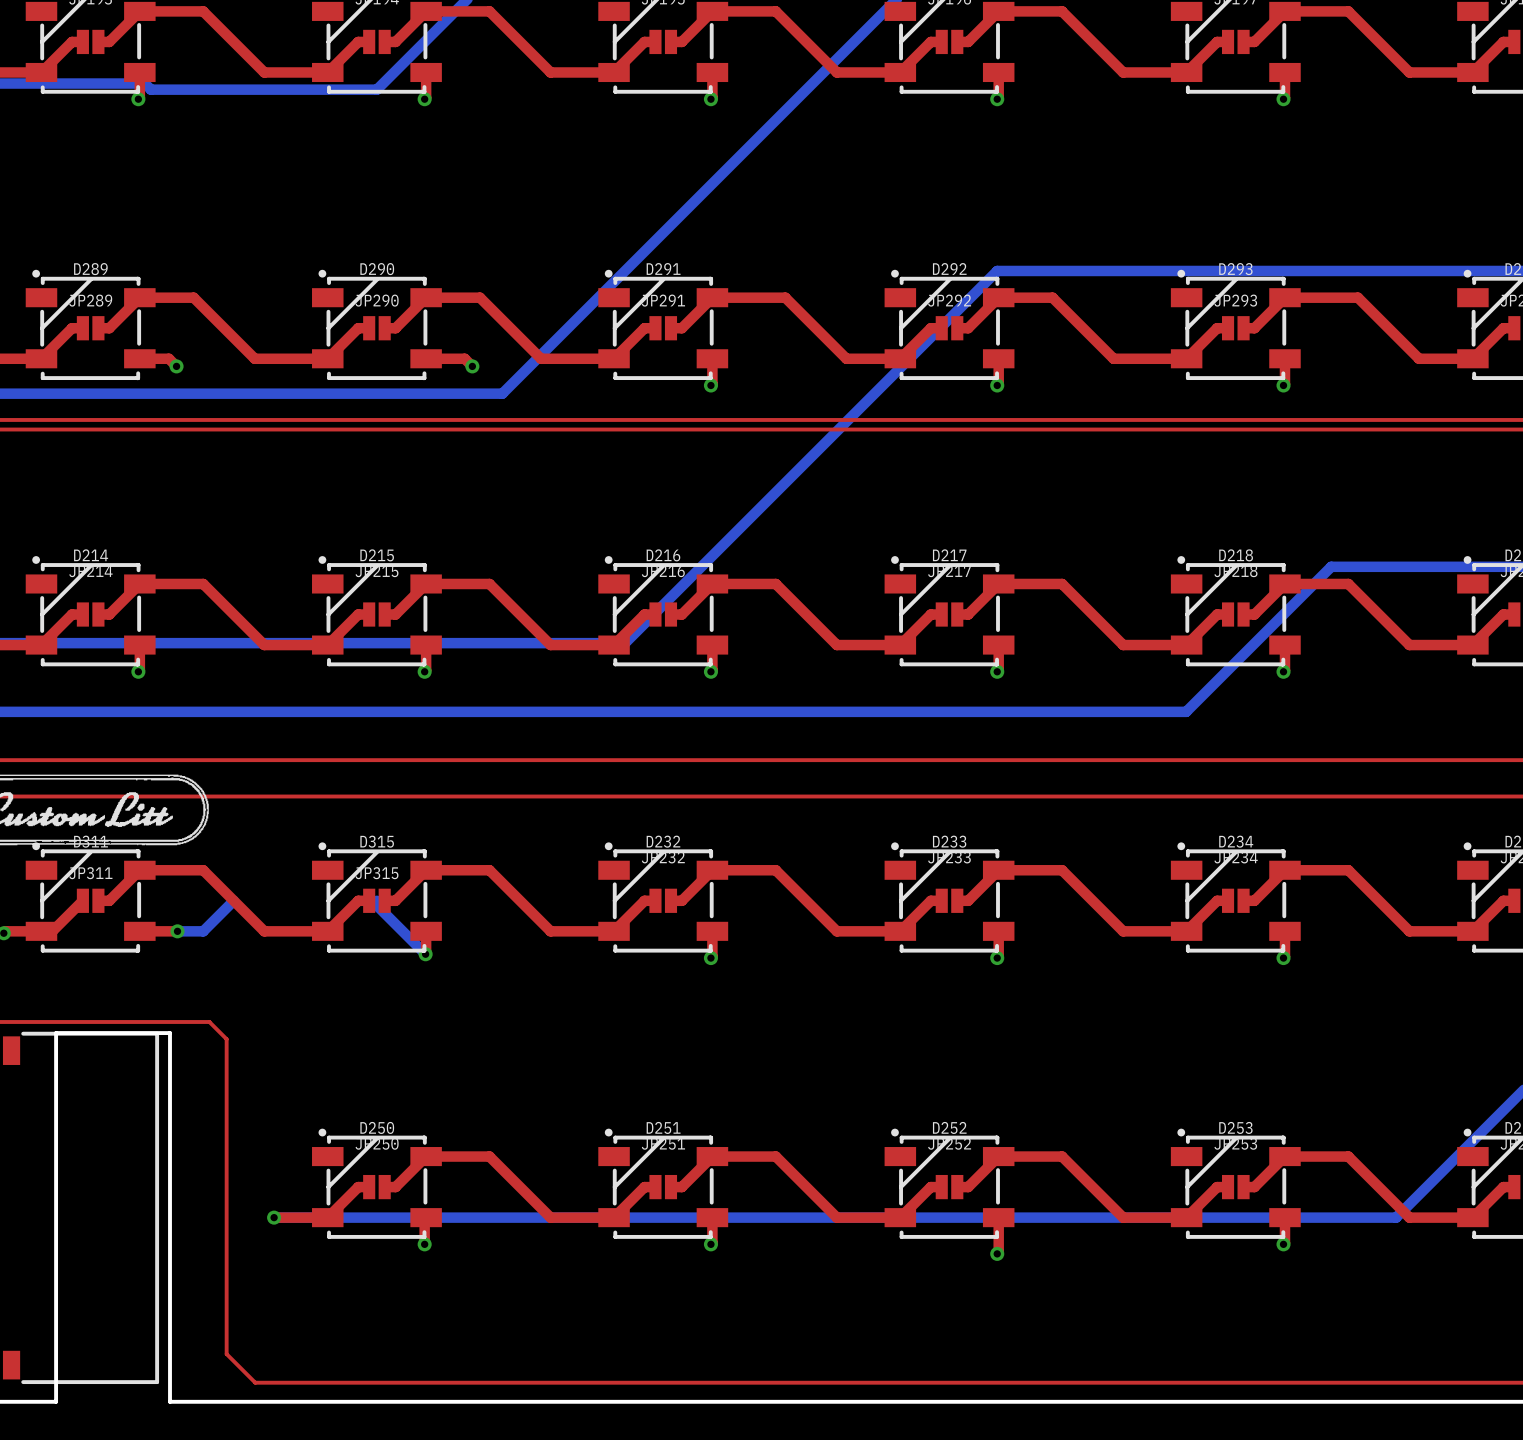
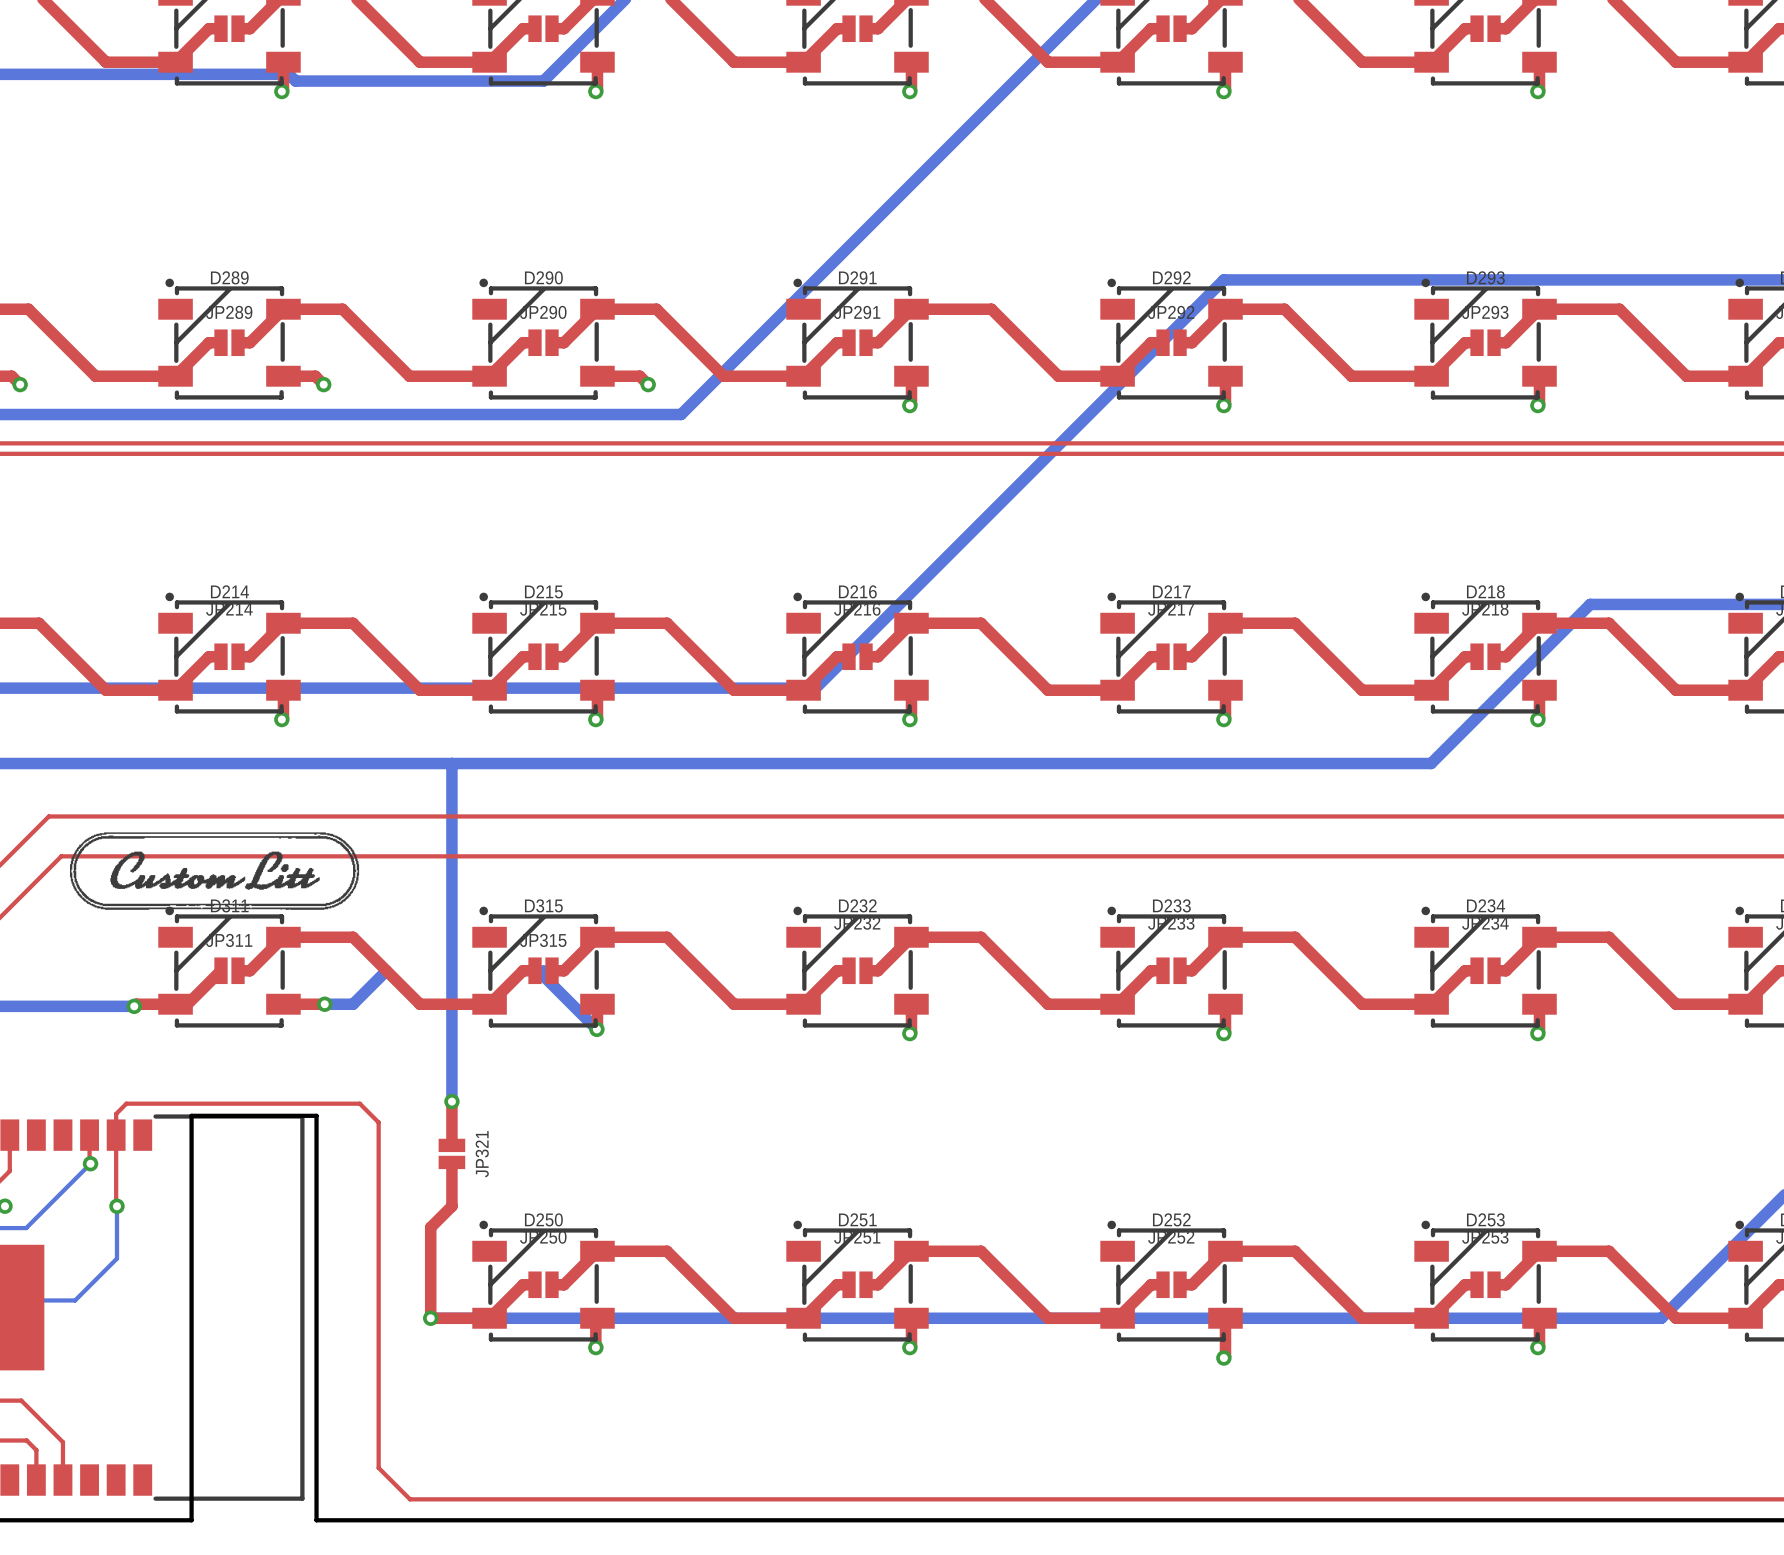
bottom track: none -> (451, 763) (451, 1101)
top track: none -> (451, 1101) (451, 1145)
via: none -> (451, 1101)
JP321: none -> (451, 1153)
top track: none -> (451, 1162) (451, 1206) (430, 1227) (430, 1318)

